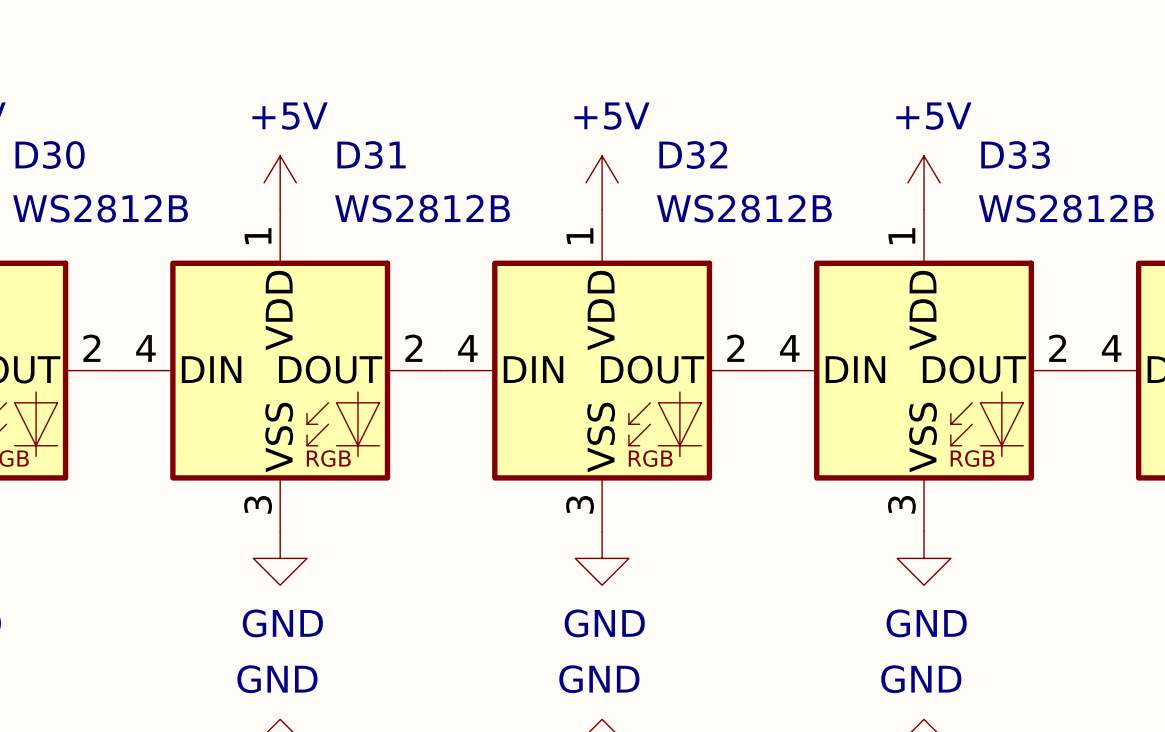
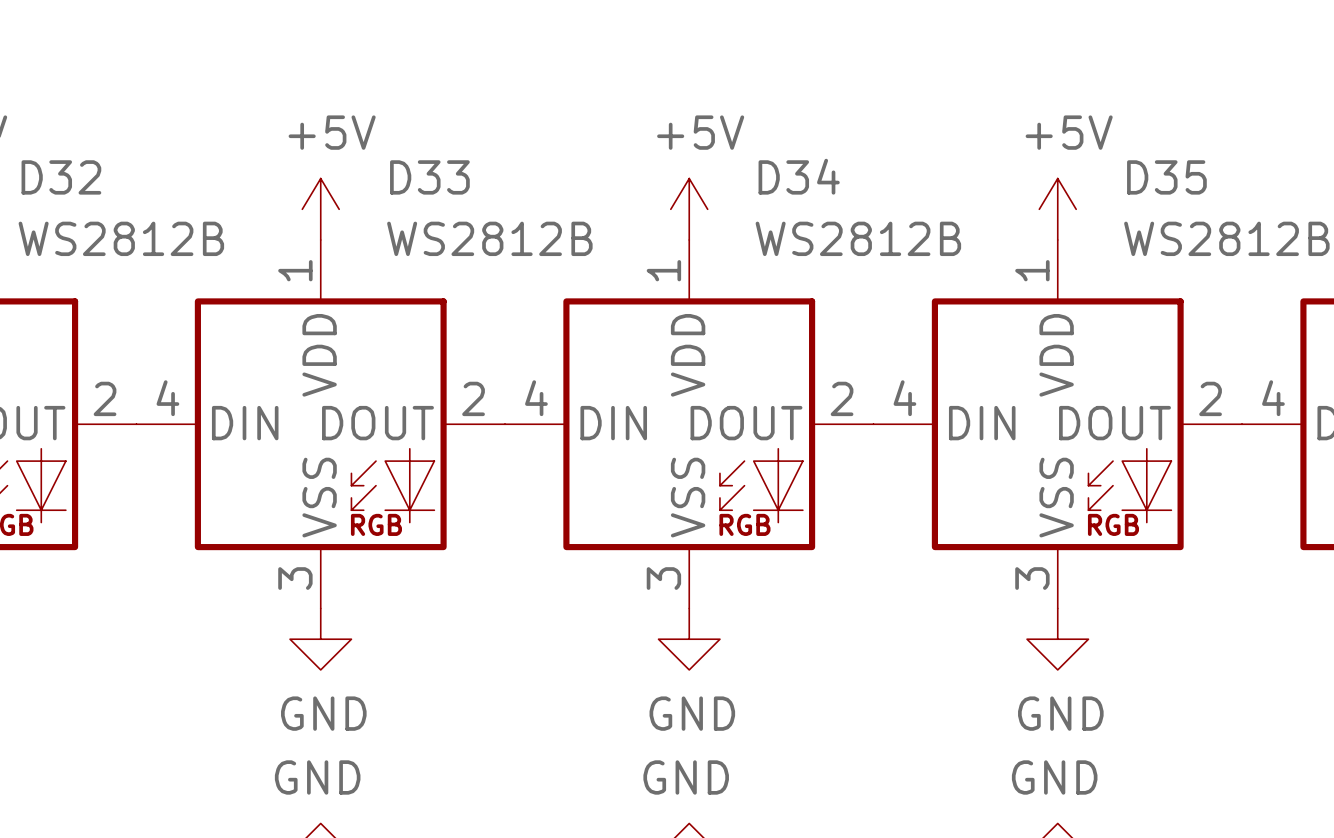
D30 name: D30 (50, 155) -> D32 (61, 177)
D31 name: D31 (371, 155) -> D33 (429, 177)
D32 name: D32 (693, 155) -> D34 (799, 176)
D33 name: D33 (1015, 155) -> D35 (1166, 177)

